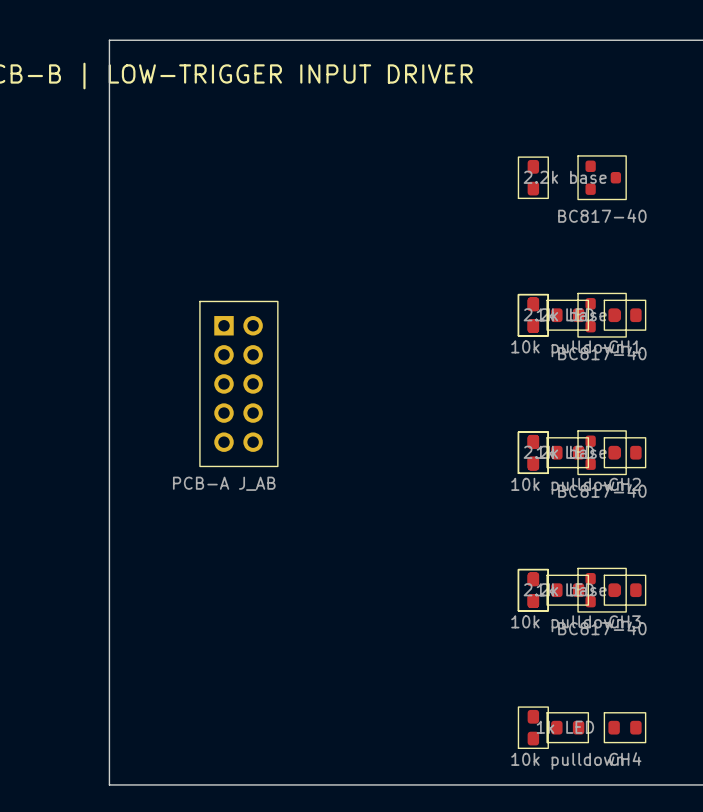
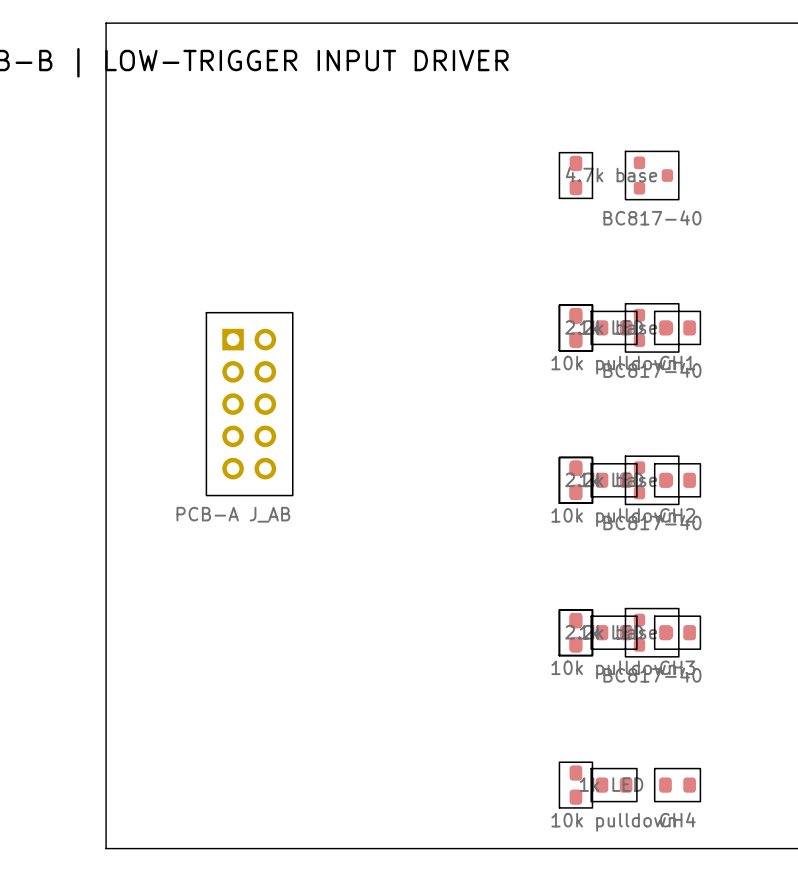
part value: 2.2k base (565, 177) -> 4.7k base (611, 174)

